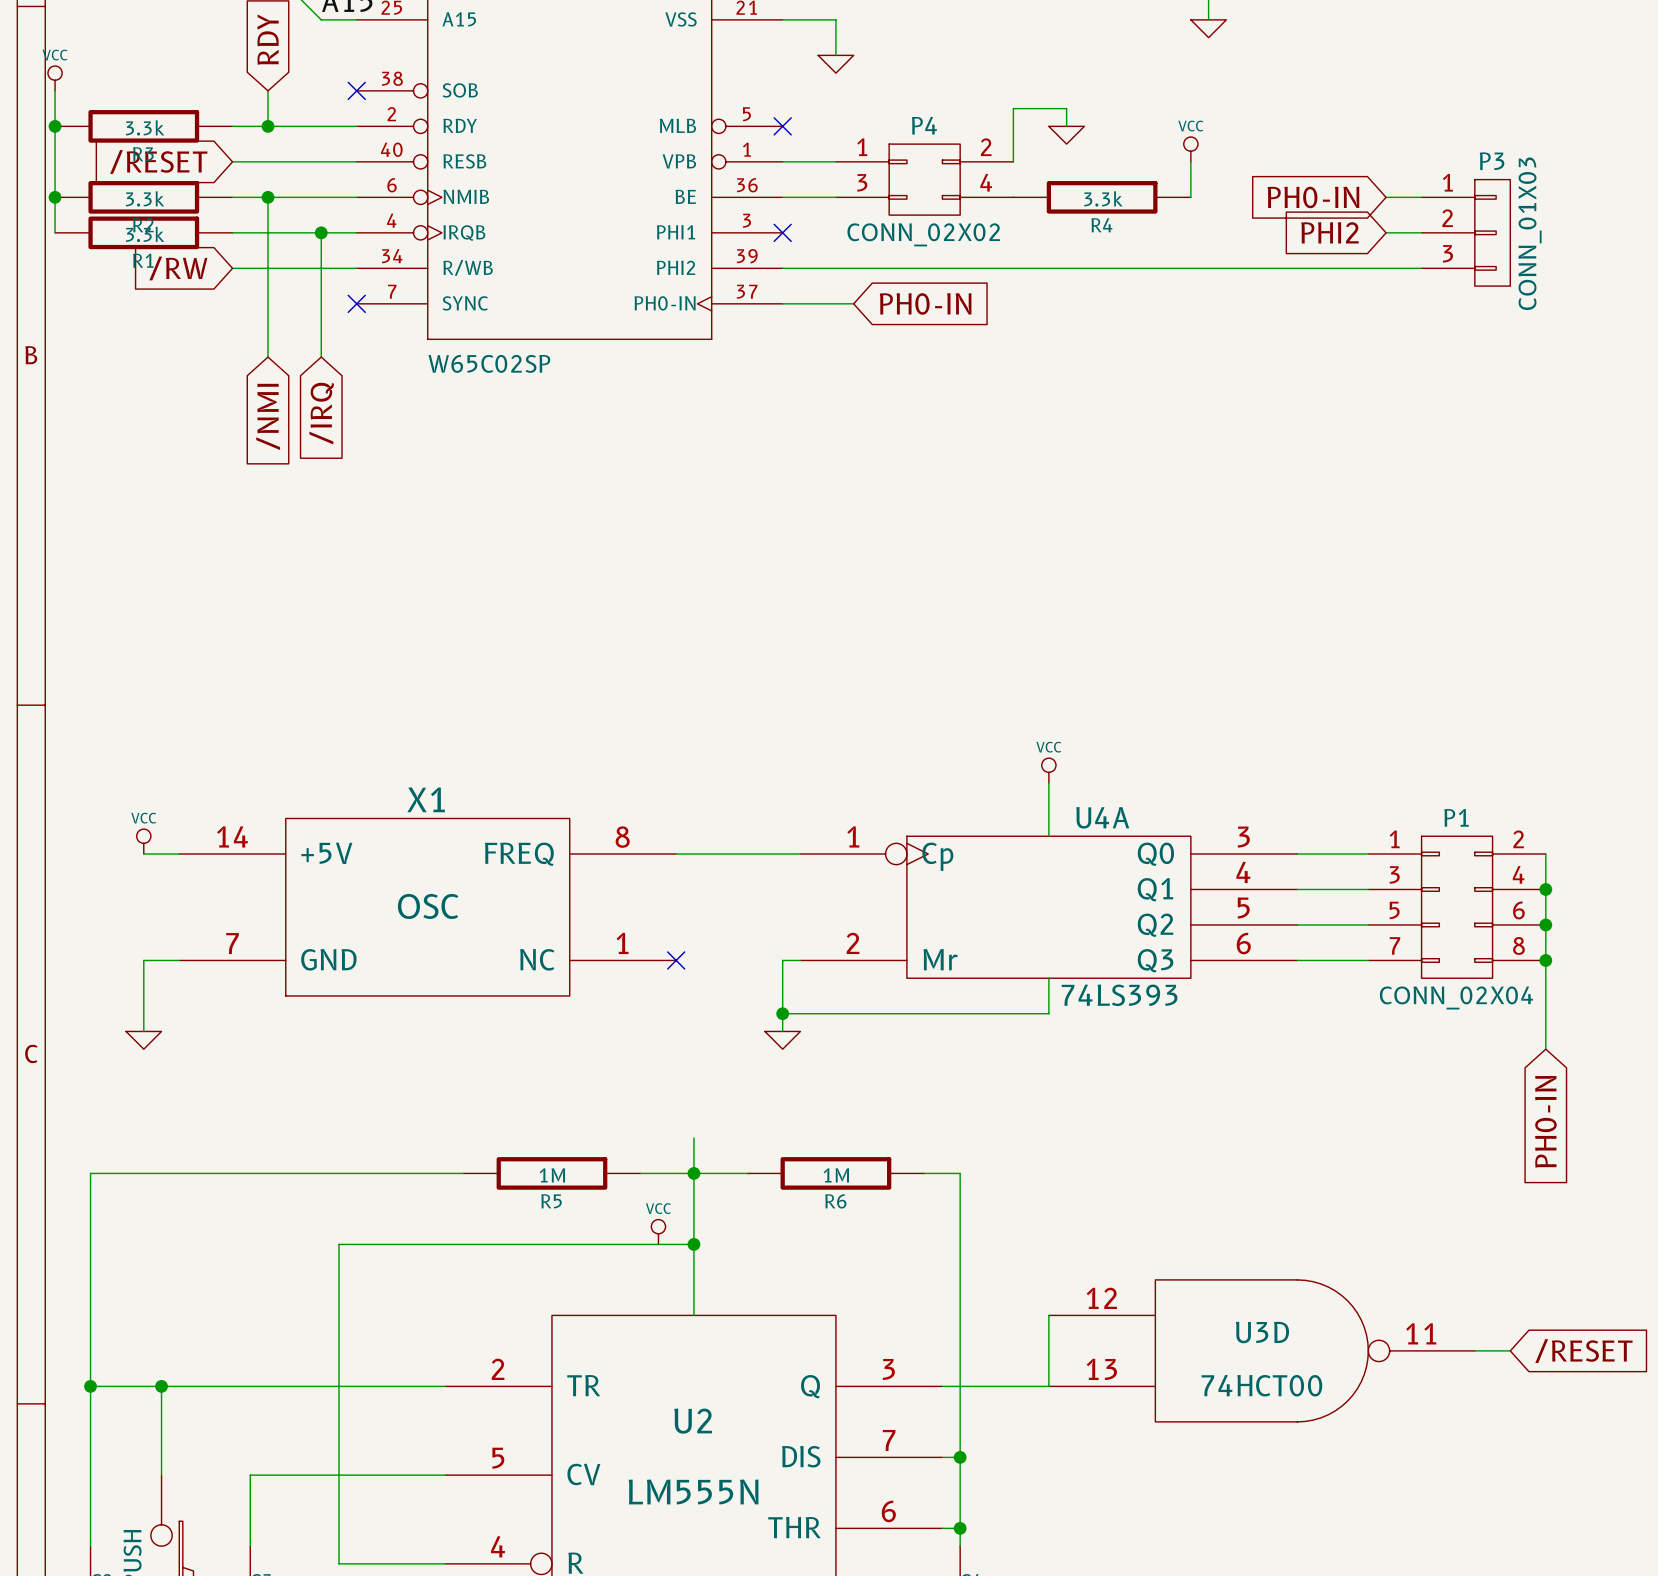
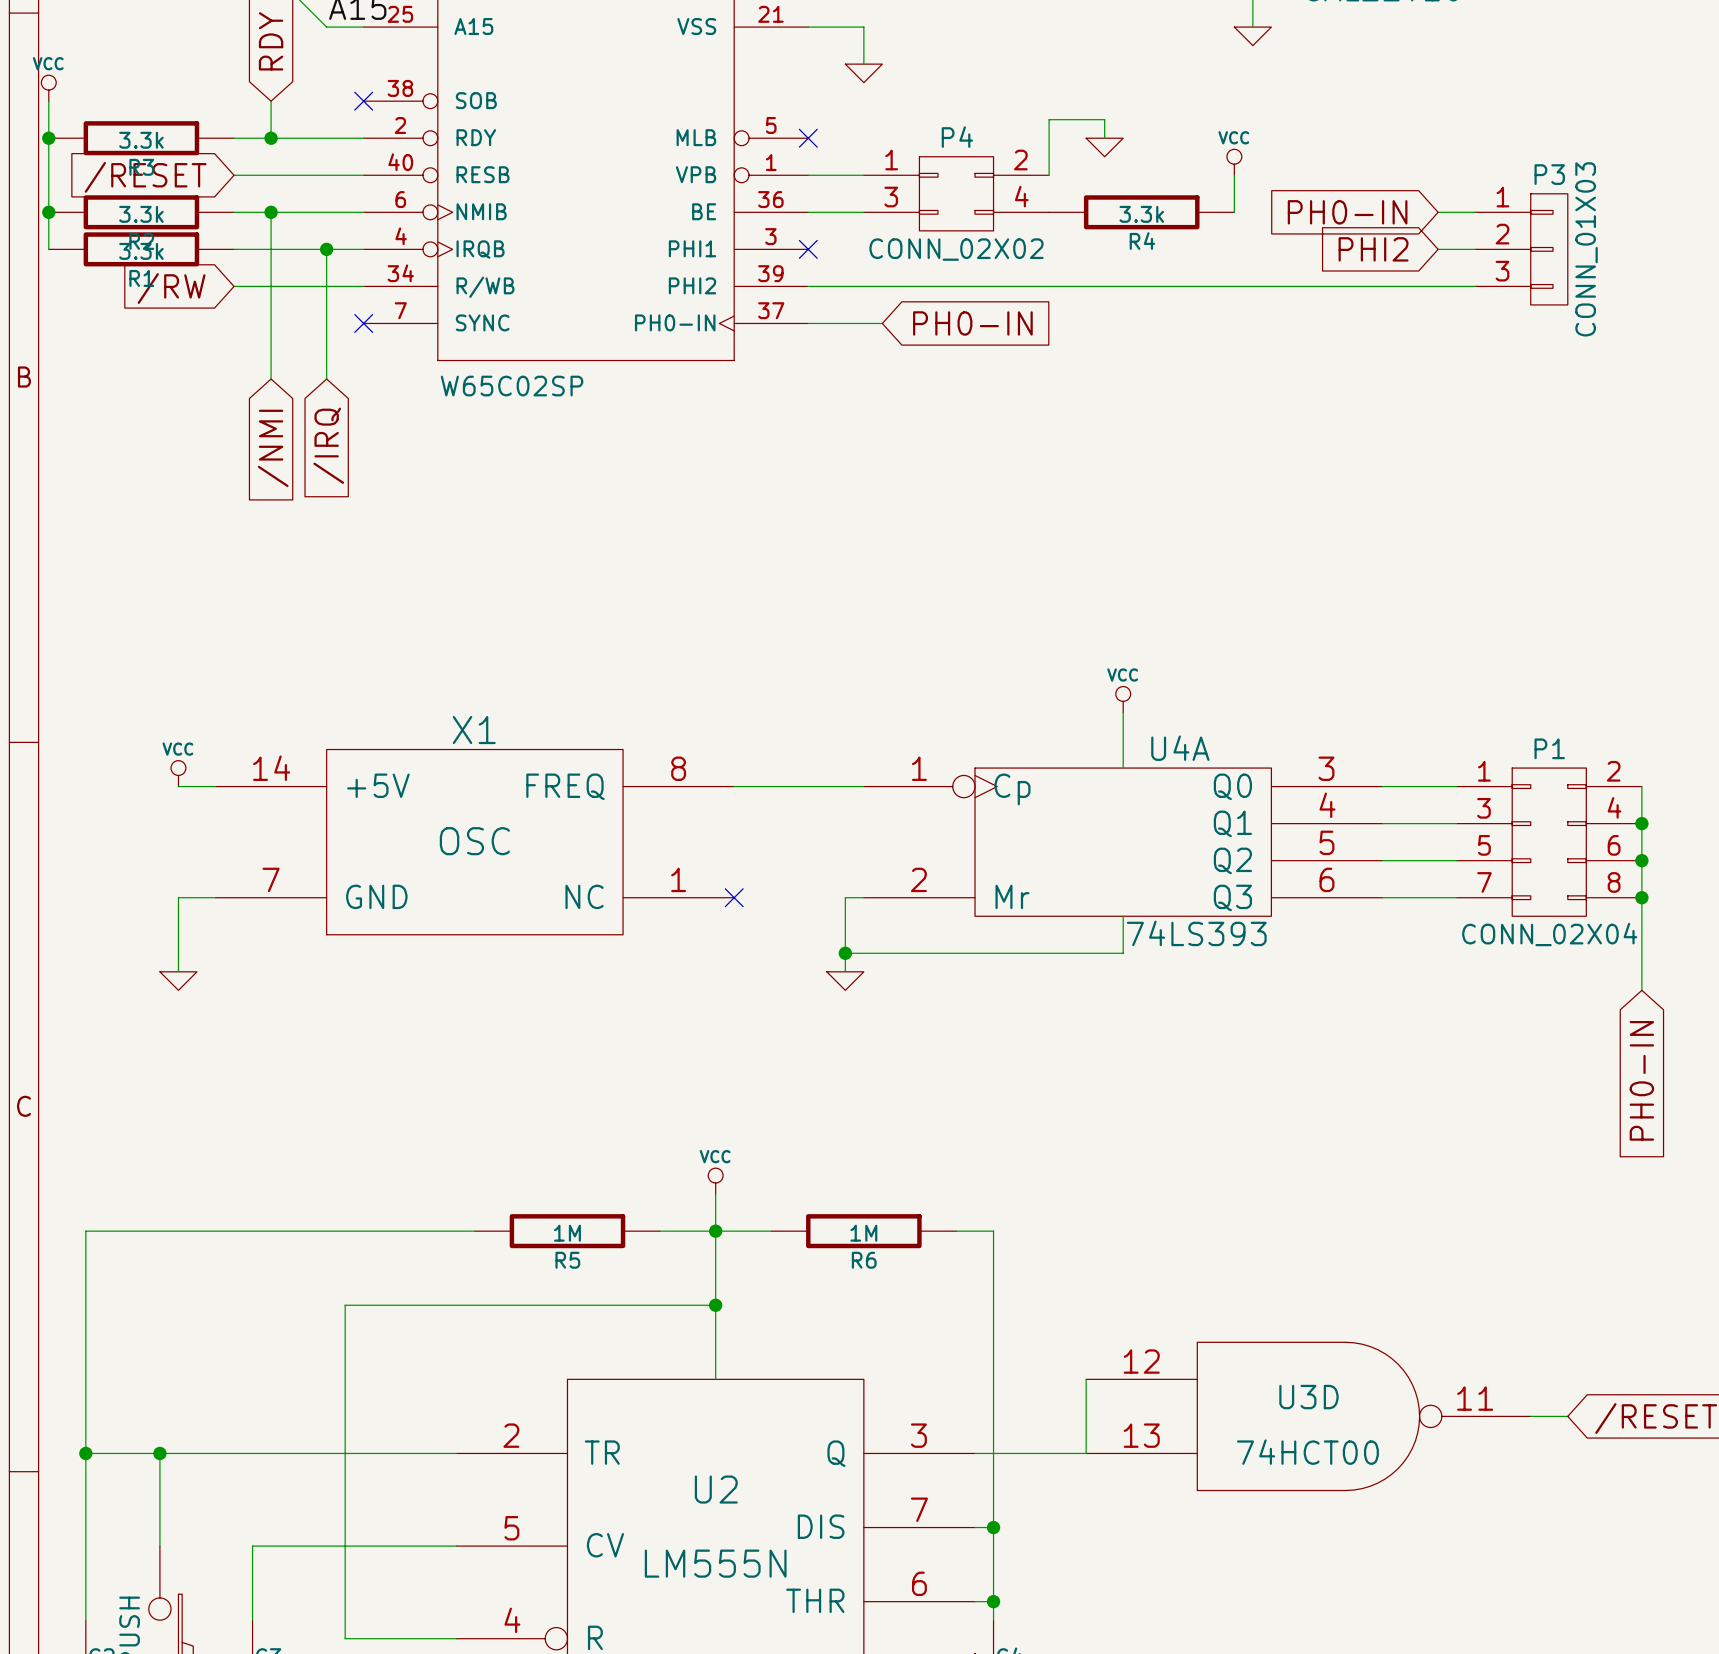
power symbol position: VCC (1048, 770) -> VCC (1123, 699)
wire: (1048, 783) (1048, 836) -> (1123, 712) (1123, 768)
junction: none -> (1641, 823)
junction: none -> (1641, 860)
power symbol position: VCC (143, 841) -> VCC (178, 773)
wire: (143, 853) (179, 853) -> (178, 786) (215, 786)
wire: (676, 853) (800, 853) -> (734, 786) (863, 786)
no-connect mark: none -> (734, 897)
wire: (1545, 853) (1545, 1049) -> (1641, 786) (1641, 990)
junction: none -> (1641, 897)
wire: (1297, 889) (1368, 889) -> (1382, 823) (1456, 823)
junction: (1545, 889) -> none
X1 position: (427, 907) -> (474, 842)
junction: none -> (845, 953)
U4A position: (1048, 907) -> (1123, 842)
P1 position: (1457, 907) -> (1549, 842)
wire: (1297, 924) (1368, 924) -> (1382, 860) (1456, 860)
junction: (1545, 924) -> none
wire: (179, 960) (143, 960) (143, 1031) -> (215, 897) (178, 897) (178, 971)
no-connect mark: (676, 960) -> none
wire: (800, 960) (782, 960) (782, 1031) -> (863, 897) (845, 897) (845, 971)
wire: (1297, 960) (1368, 960) -> (1382, 786) (1456, 786)
junction: (1545, 960) -> none
wire: (1048, 978) (1048, 1013) (782, 1013) -> (1123, 916) (1123, 953) (845, 953)
junction: (782, 1013) -> none
power symbol position: (143, 1040) -> (178, 981)
power symbol position: (782, 1040) -> (845, 981)
global label position: PH0-IN (1545, 1121) -> PH0-IN (1641, 1080)
power symbol position: VCC (658, 1232) -> VCC (715, 1181)

